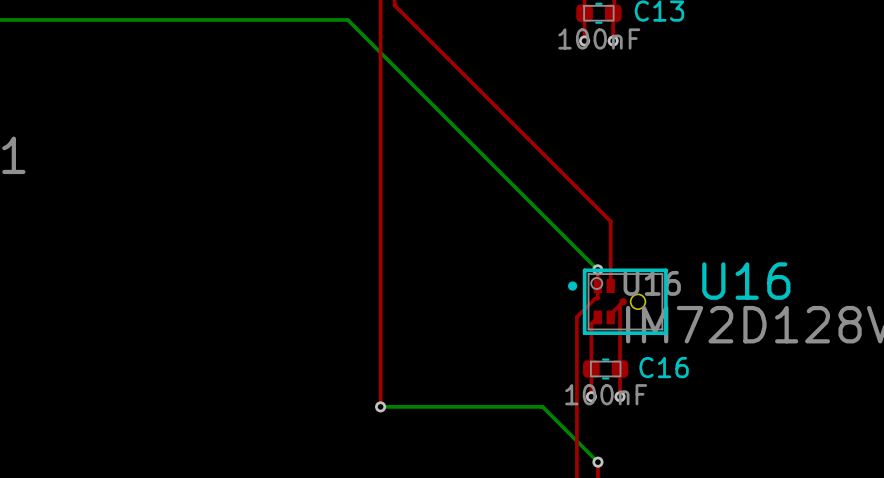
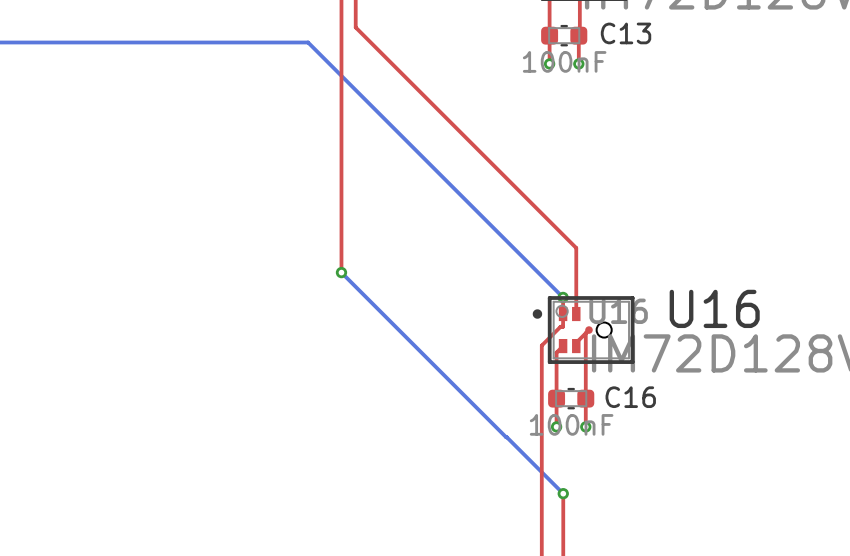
top track: (380, 245) (380, 406) -> none
via: none -> (341, 272)
bottom track: (380, 406) (542, 406) -> (341, 272) (506, 437)
via: (380, 406) -> none

